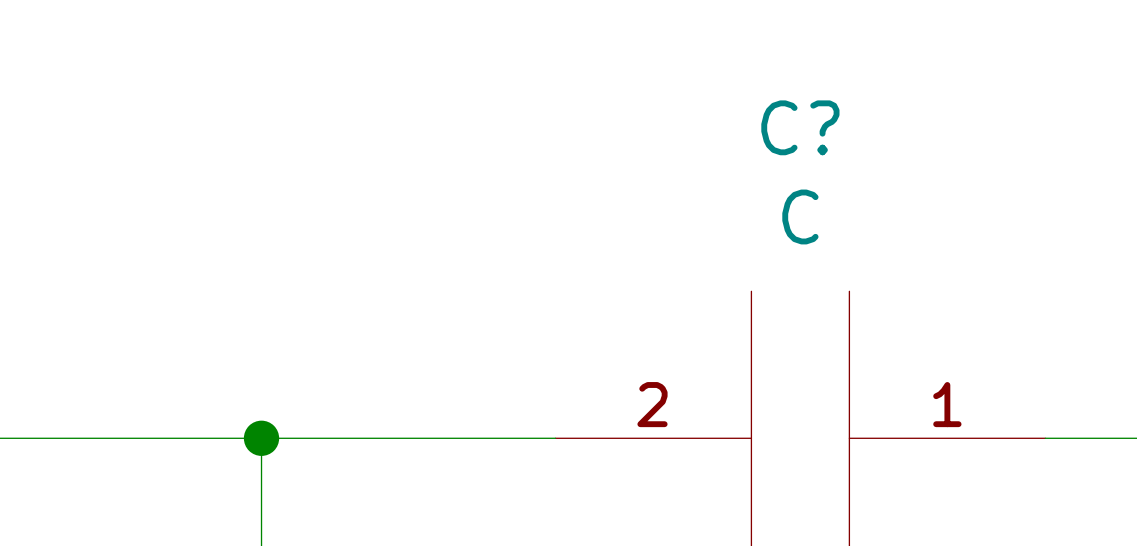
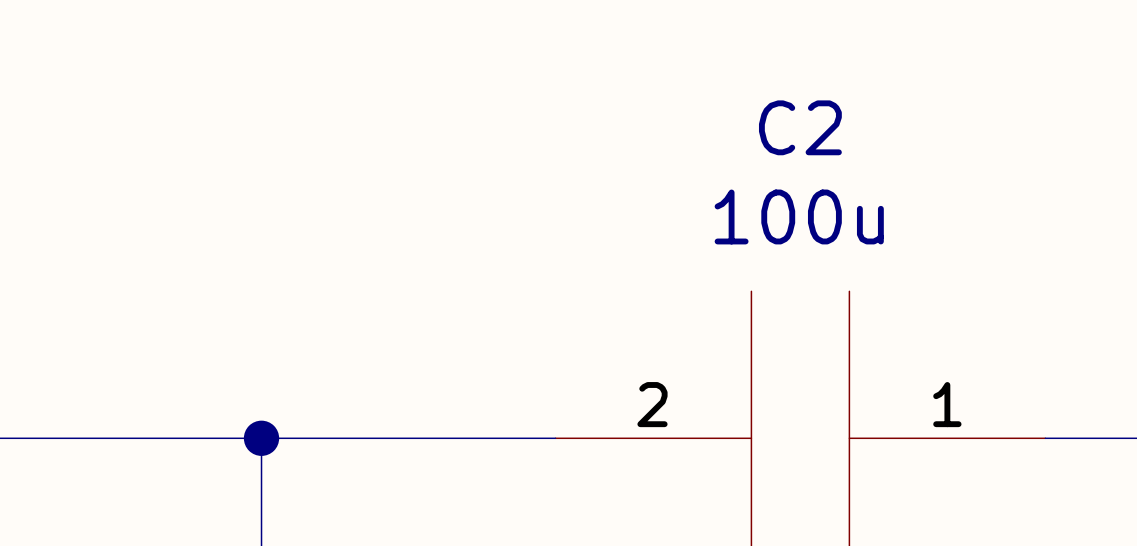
C? name: C? (800, 127) -> C2 (800, 127)
C? value: C (800, 216) -> 100u (799, 216)

